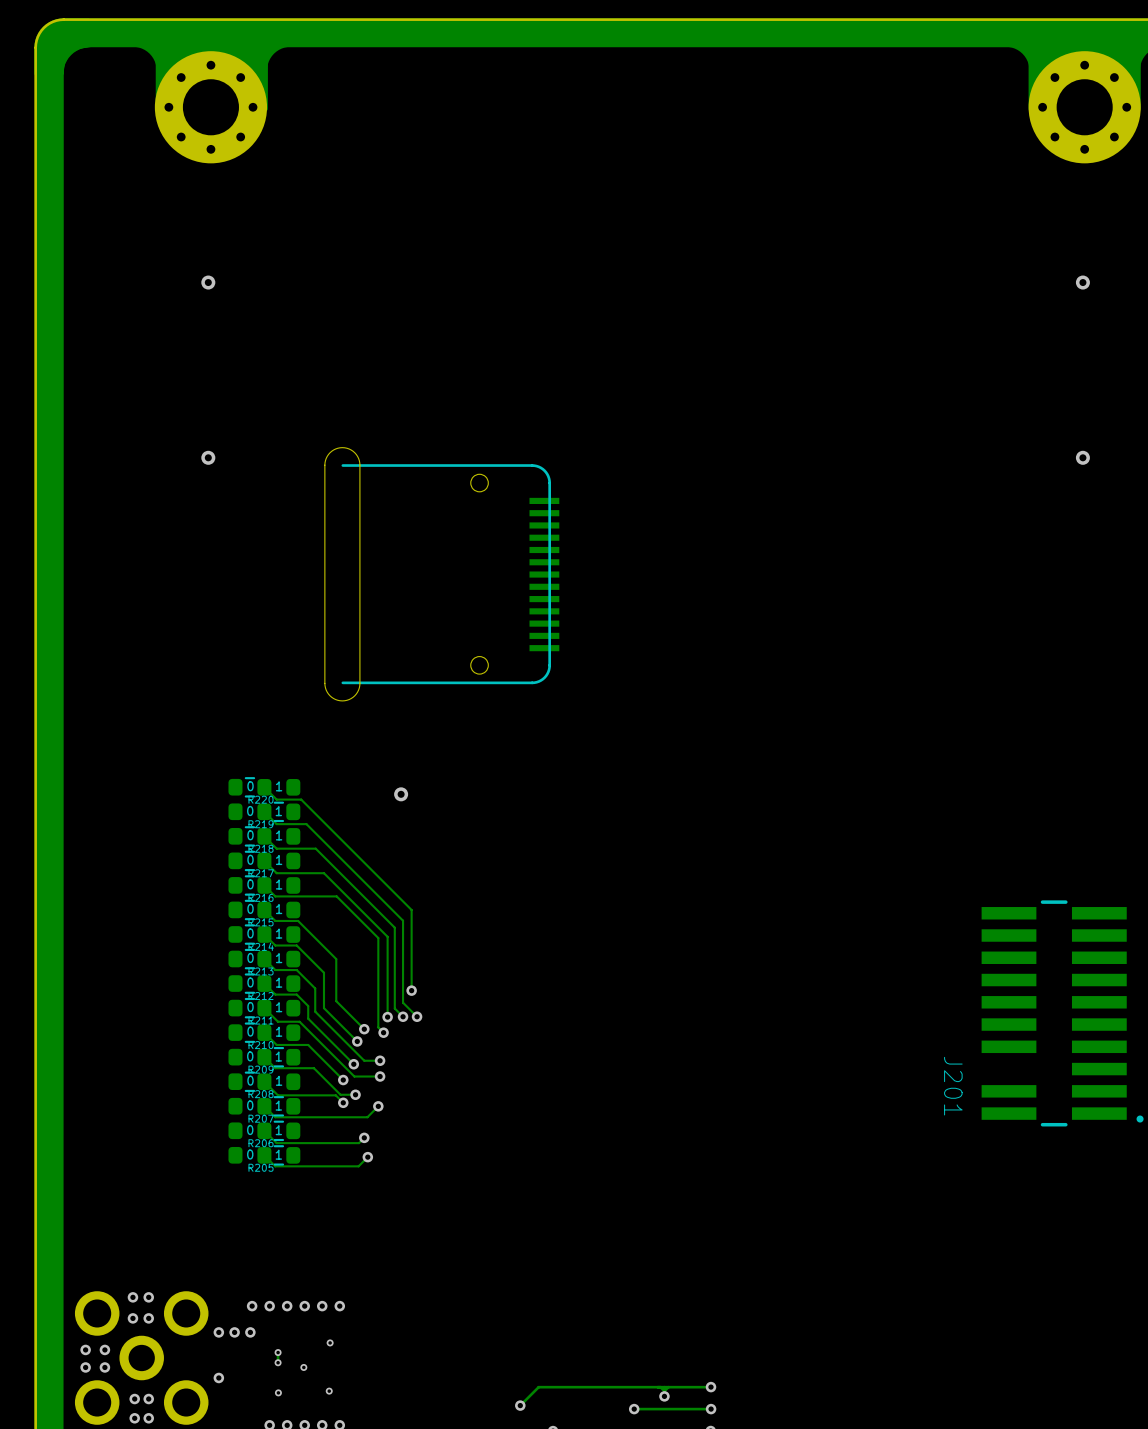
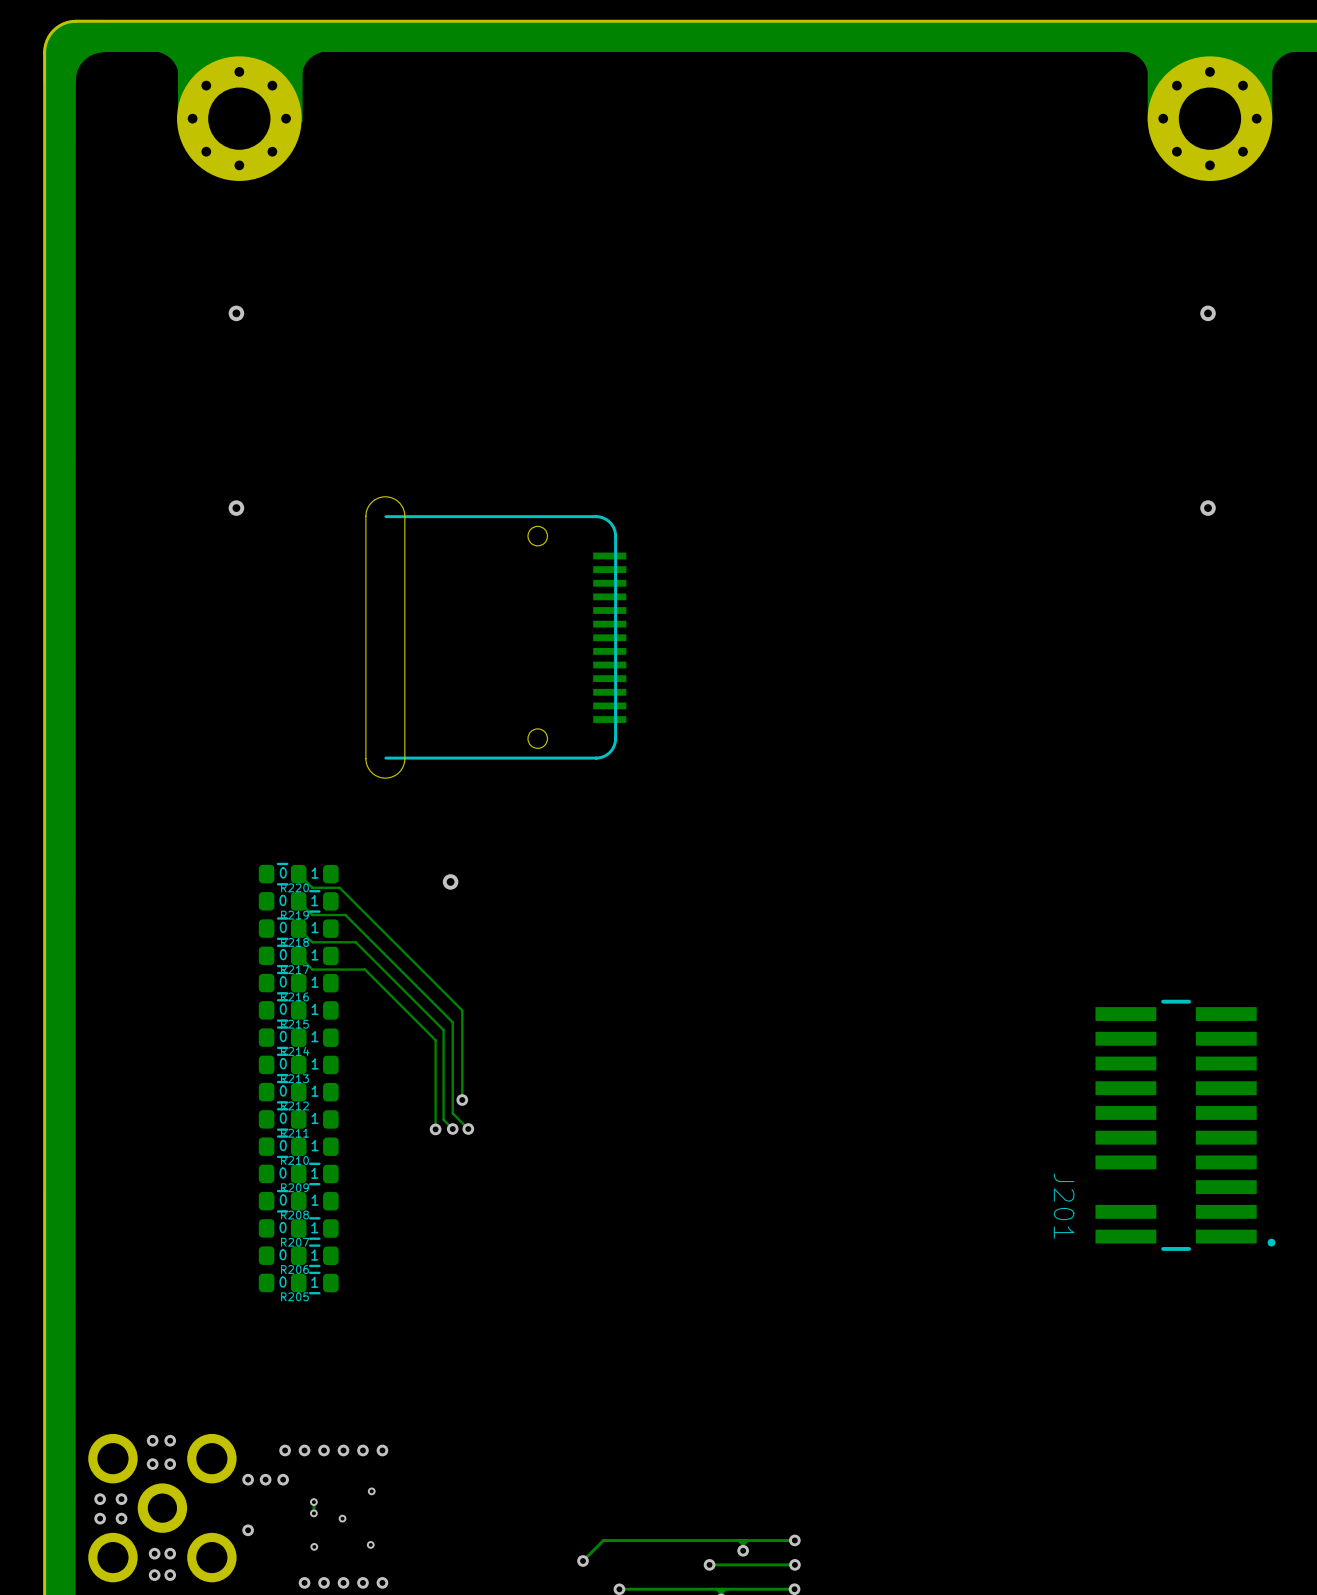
track: (264, 885) (275, 896) (336, 896) (378, 938) (378, 1027) (383, 1032) -> none
track: (264, 910) (275, 920) (298, 920) (336, 959) (336, 1001) (364, 1029) -> none
track: (264, 934) (275, 945) (296, 945) (323, 972) (323, 1008) (357, 1041) -> none
track: (264, 959) (275, 970) (296, 970) (315, 988) (315, 1011) (364, 1060) (380, 1060) -> none
track: (264, 983) (275, 994) (296, 994) (308, 1006) (308, 1018) (353, 1064) -> none
track: (264, 1008) (277, 1021) (299, 1021) (354, 1076) (380, 1076) -> none
via: (364, 1029) -> none
track: (264, 1032) (276, 1044) (308, 1044) (343, 1080) -> none
via: (383, 1032) -> none
via: (357, 1041) -> none
track: (264, 1057) (275, 1068) (313, 1068) (340, 1094) (355, 1094) -> none
via: (380, 1060) -> none
via: (353, 1064) -> none
via: (380, 1076) -> none
via: (343, 1080) -> none
track: (264, 1081) (277, 1095) (335, 1095) (343, 1102) -> none
via: (355, 1094) -> none
via: (343, 1102) -> none
track: (378, 1106) (367, 1117) (275, 1117) (264, 1106) -> none
via: (378, 1106) -> none
track: (264, 1130) (276, 1143) (359, 1143) (364, 1137) -> none
via: (364, 1137) -> none
track: (264, 1155) (275, 1166) (358, 1166) (367, 1157) -> none
via: (367, 1157) -> none

